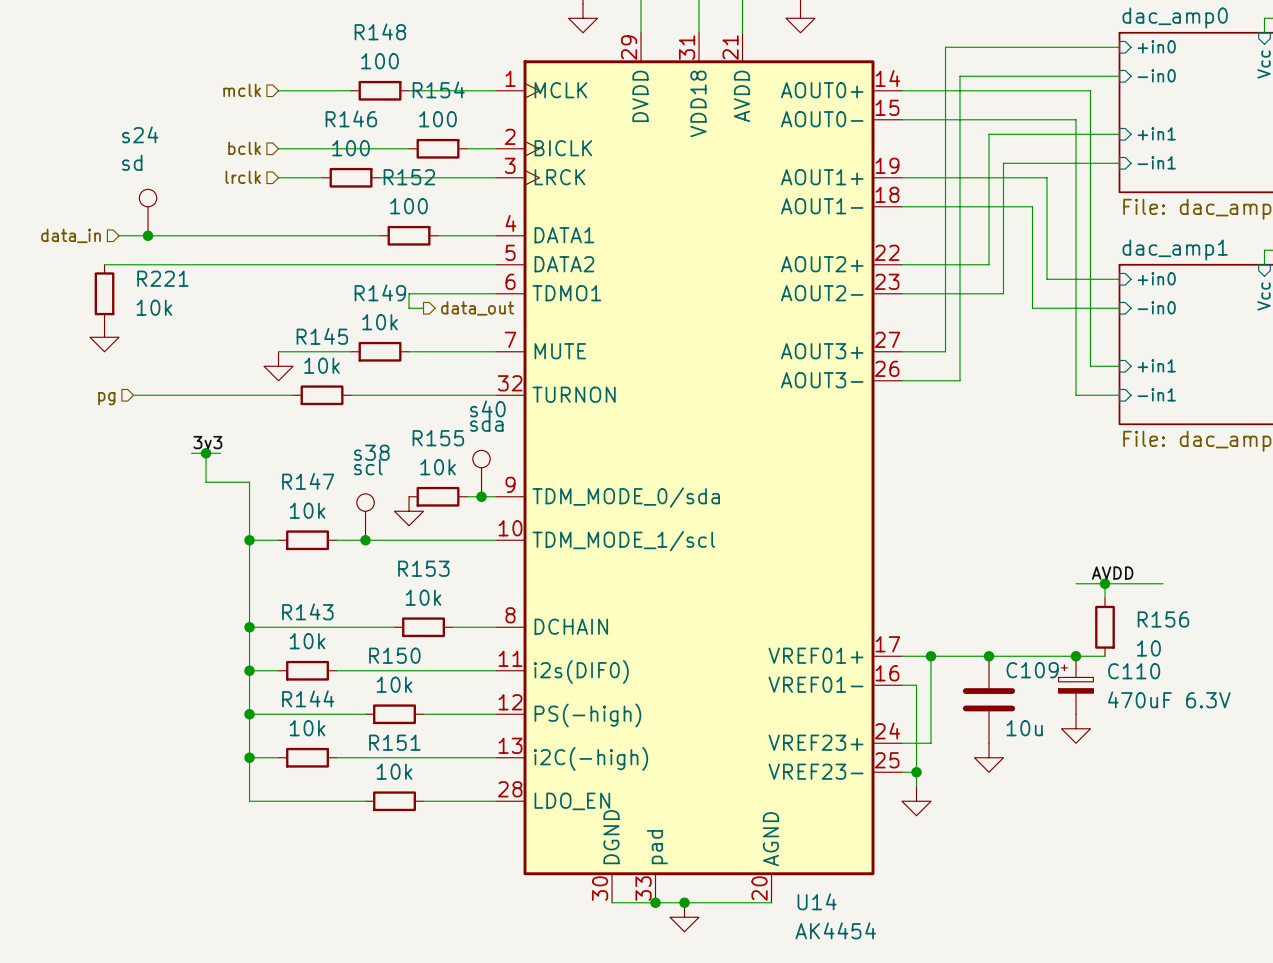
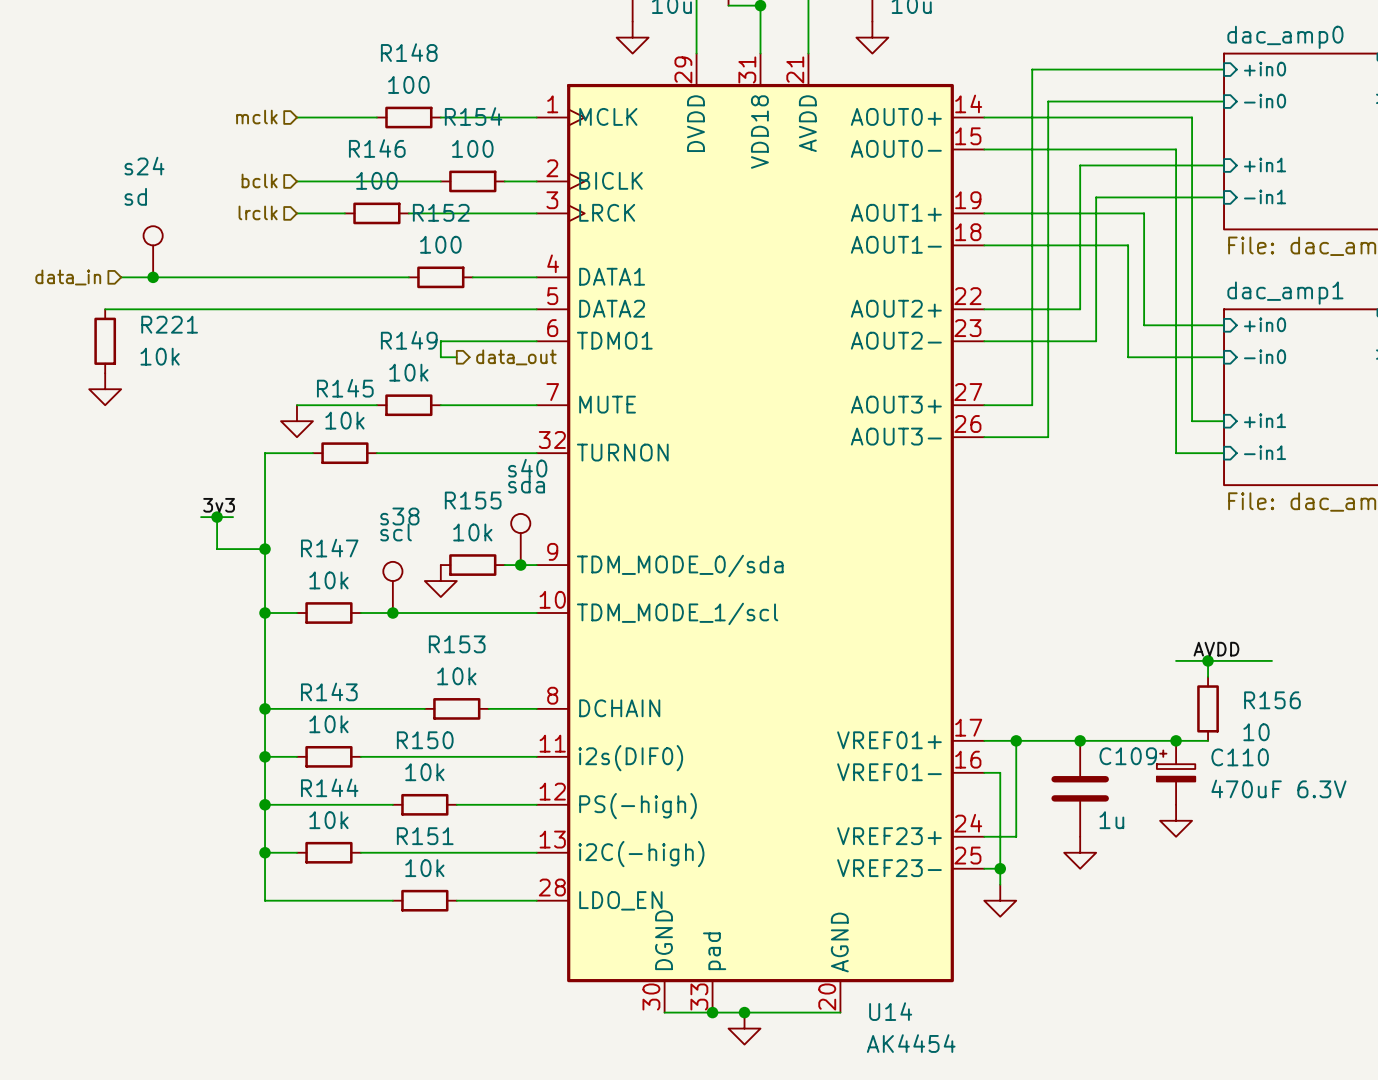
wire: (133, 395) (249, 395) -> (265, 549) (265, 453)
hierarchical label: pg (106, 398) -> none
junction: none -> (265, 549)
C109 value: 10u (1024, 728) -> 1u (1111, 820)

